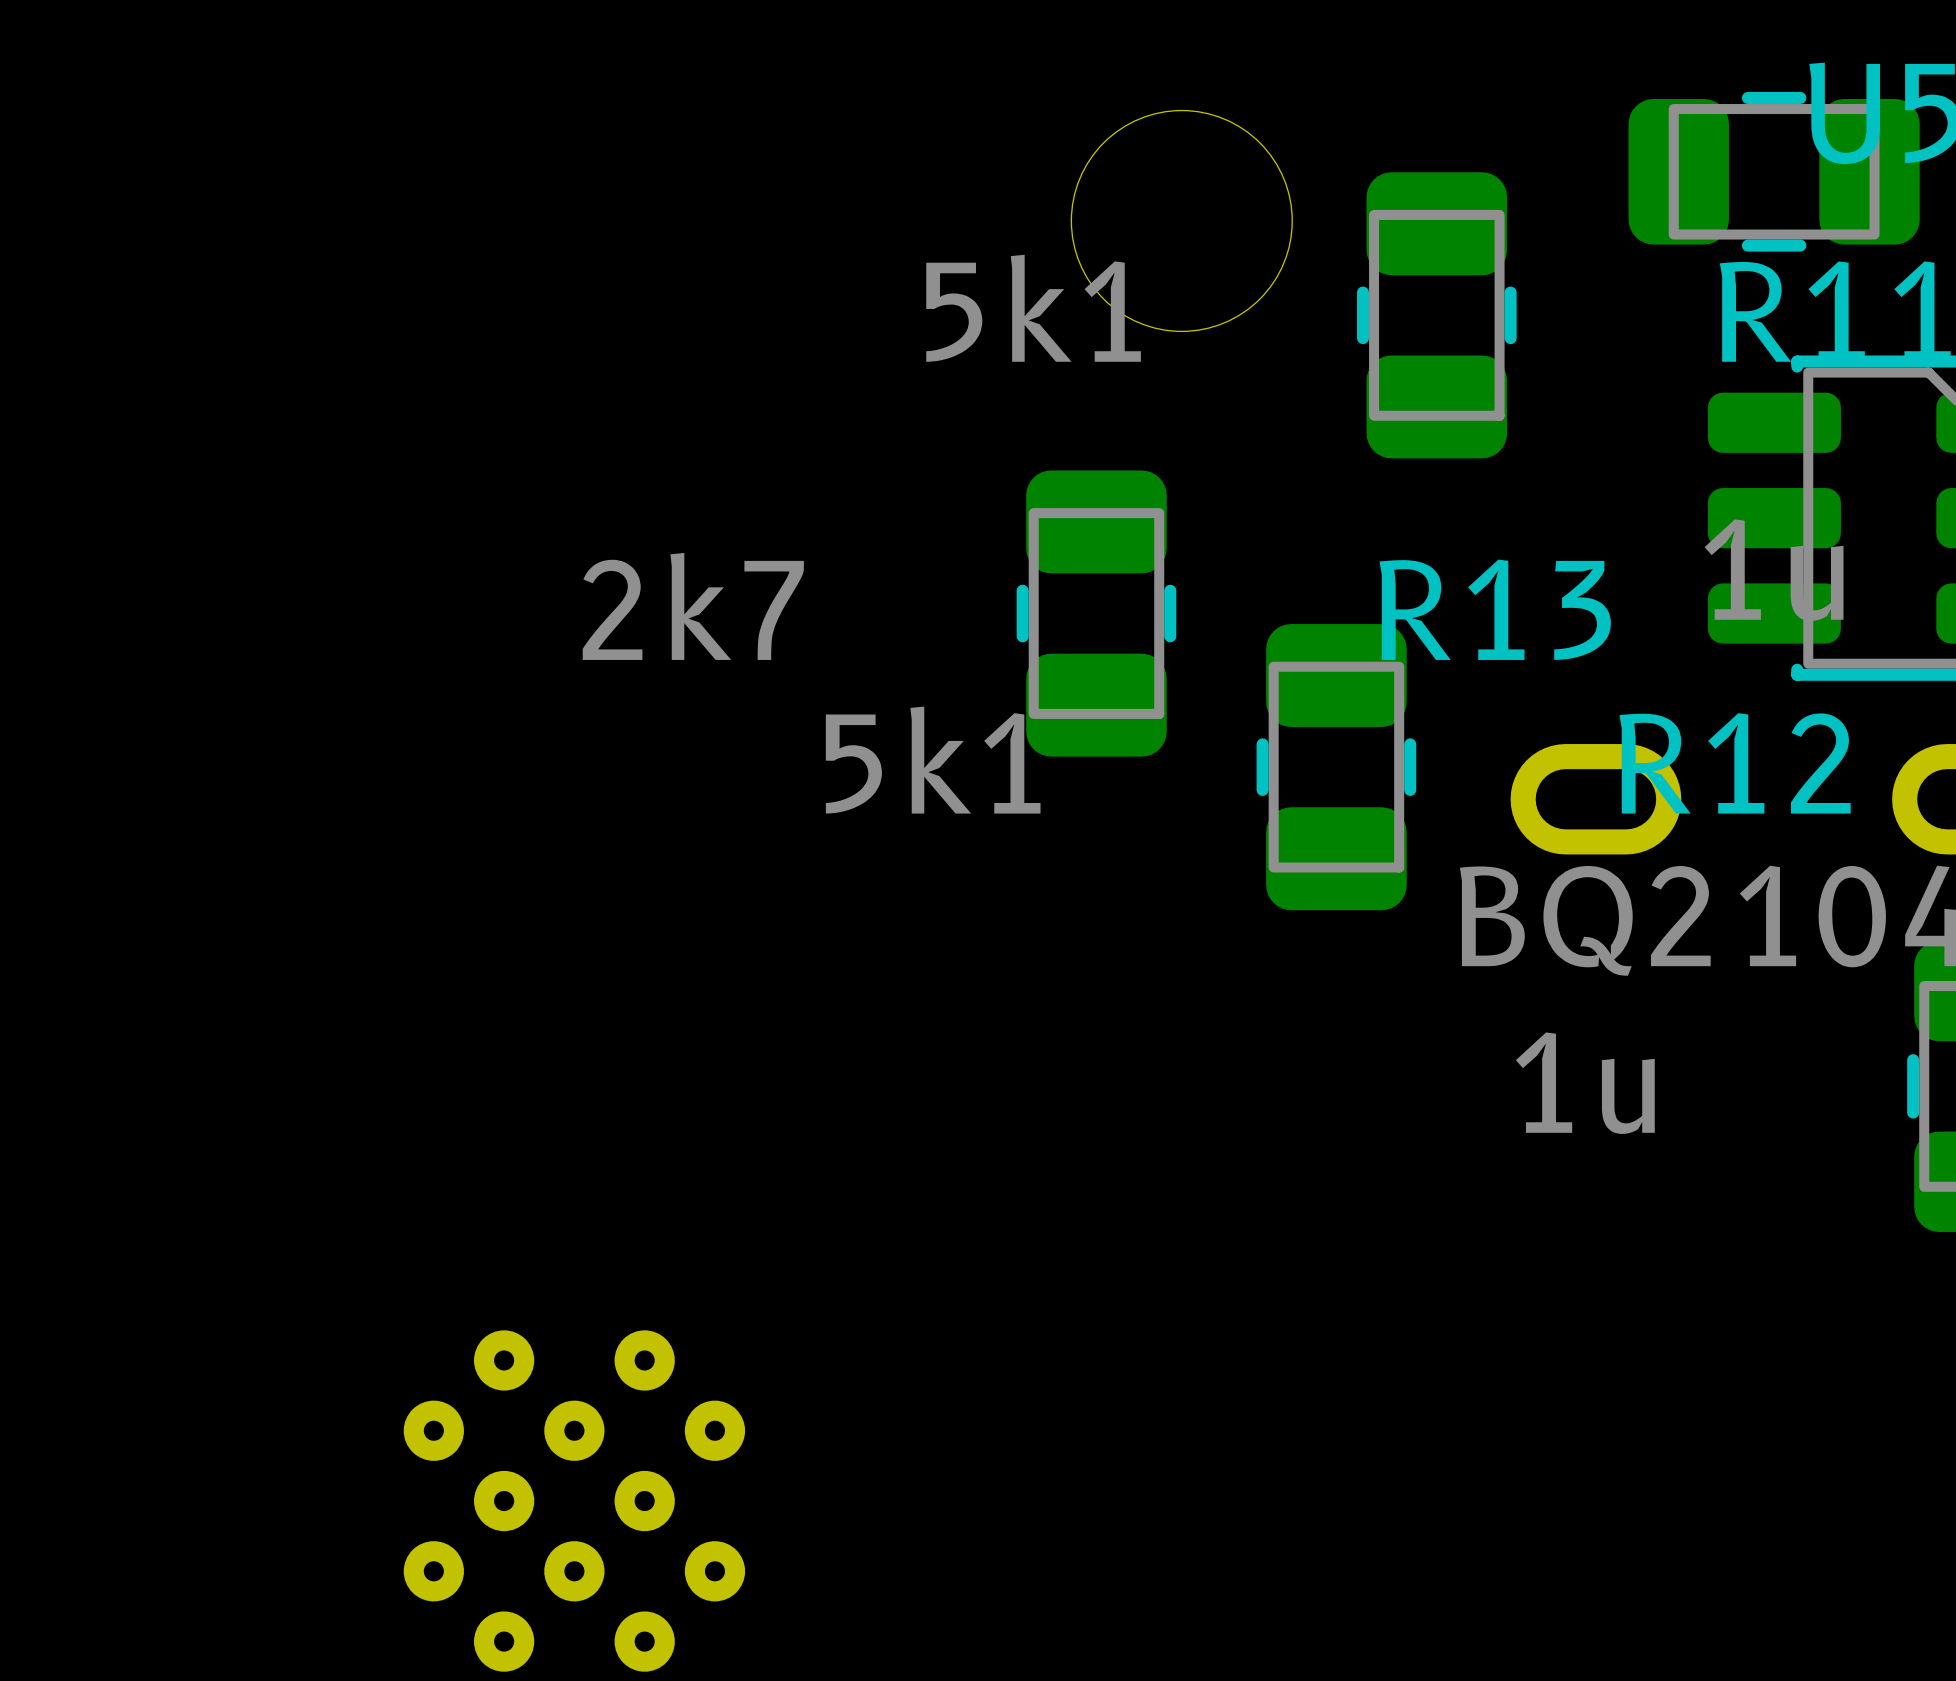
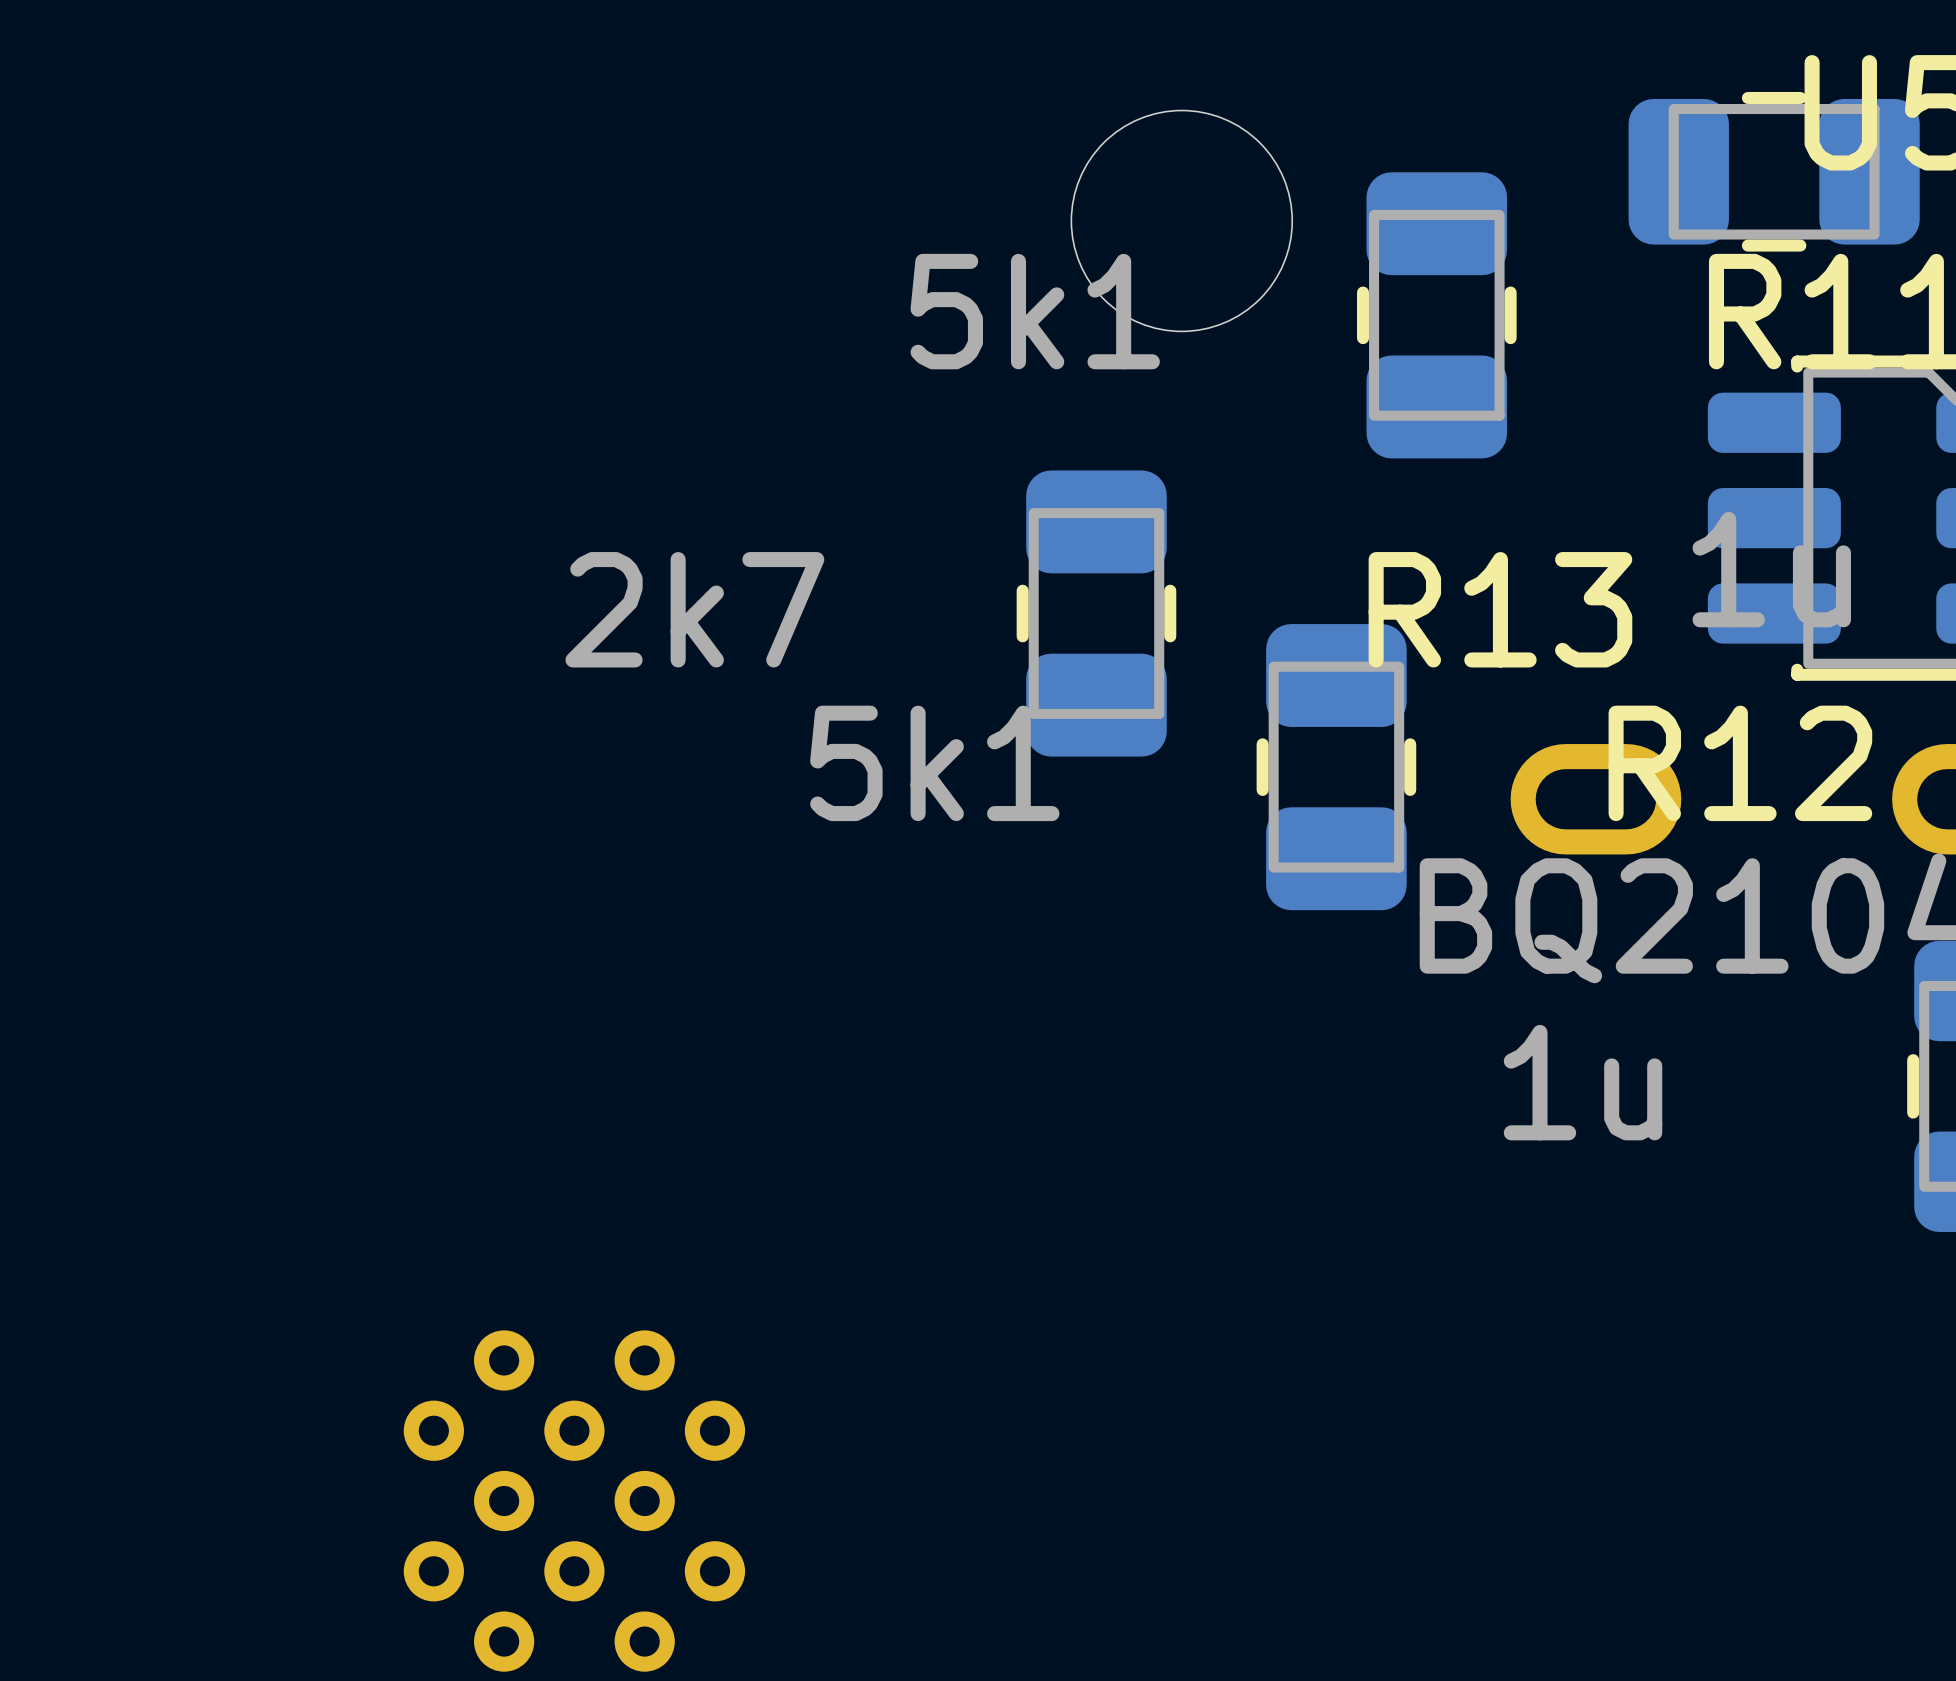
part footprint: [403, 1330, 746, 1672] -> [403, 1330, 746, 1672]

